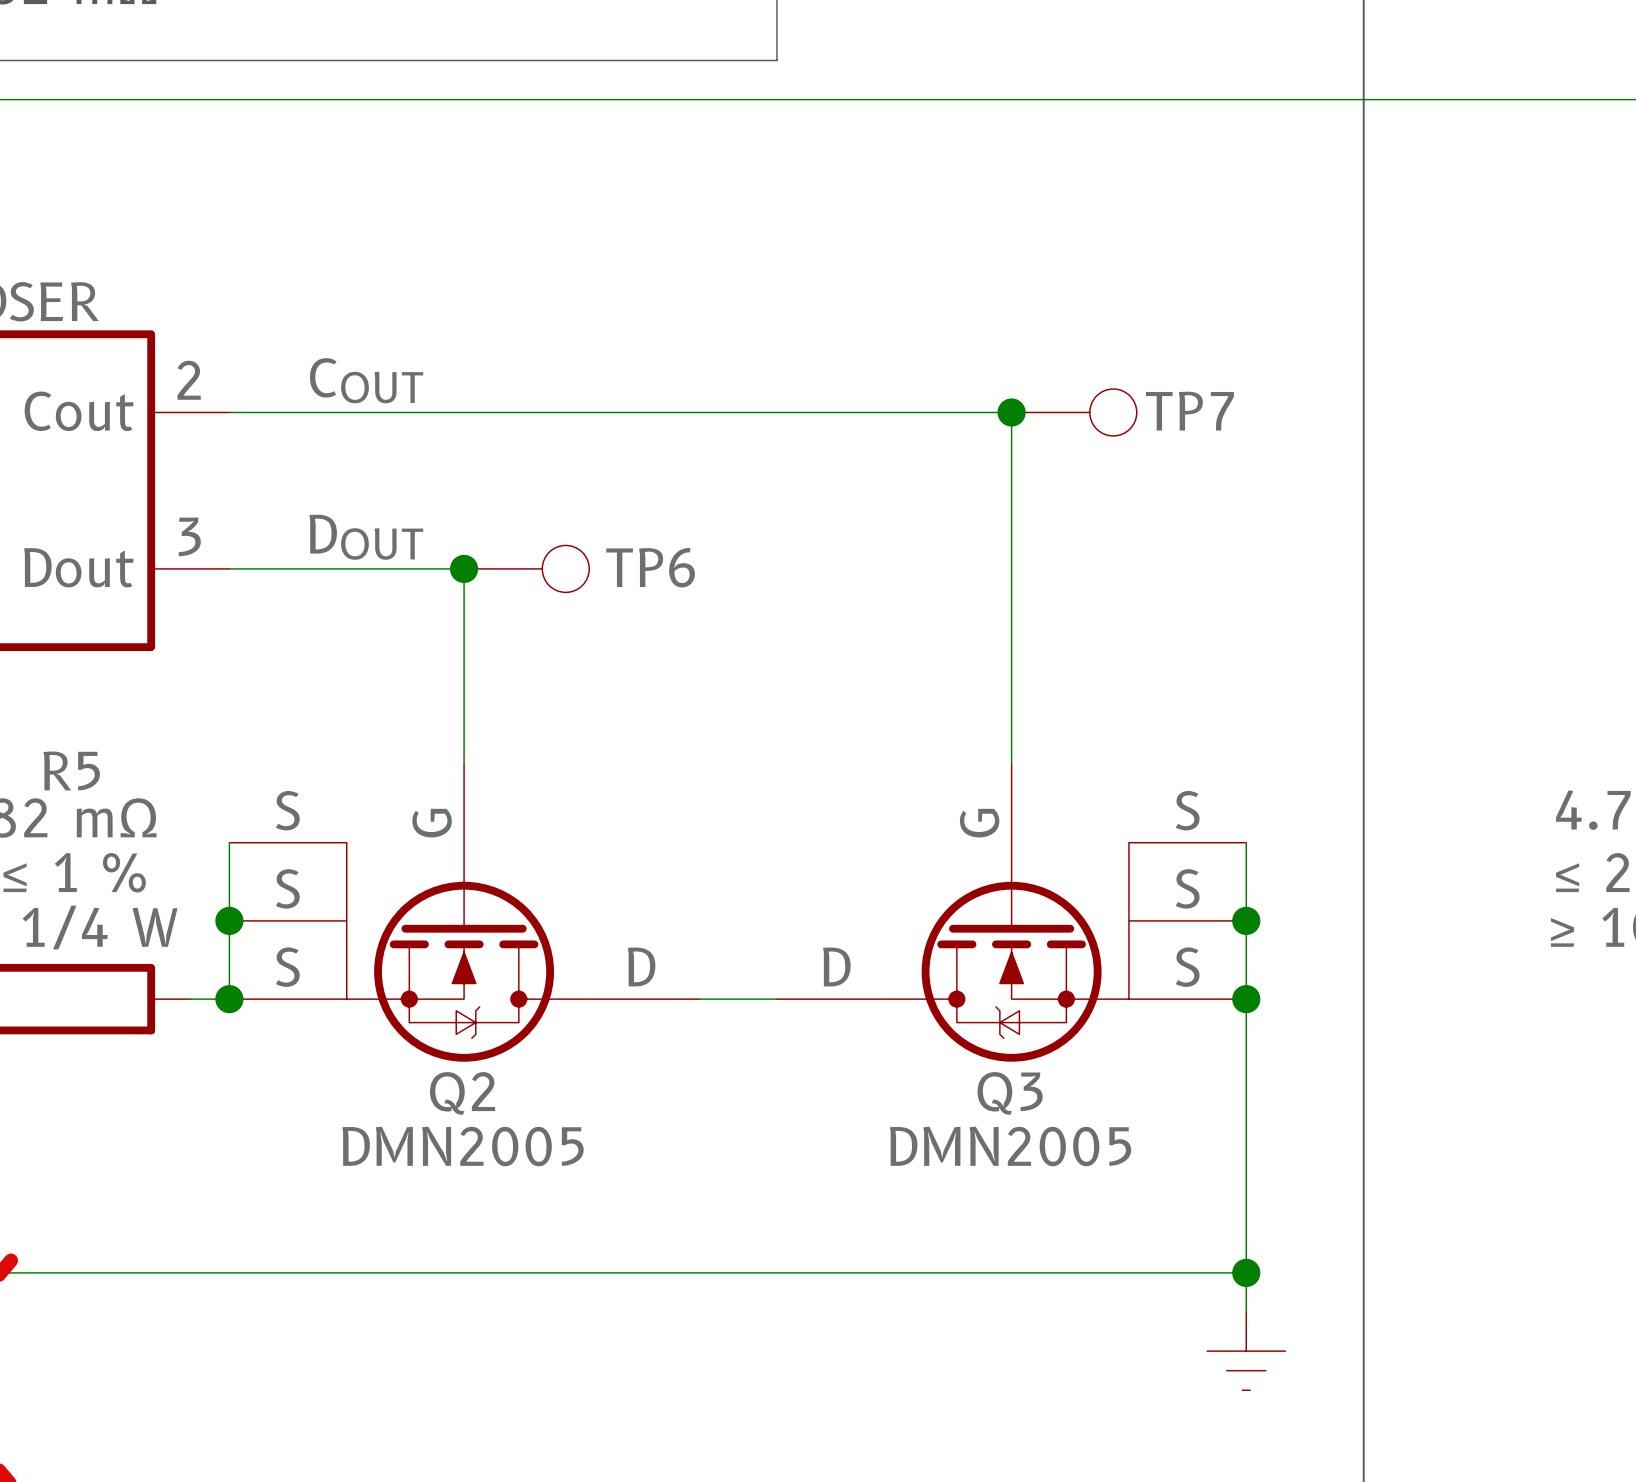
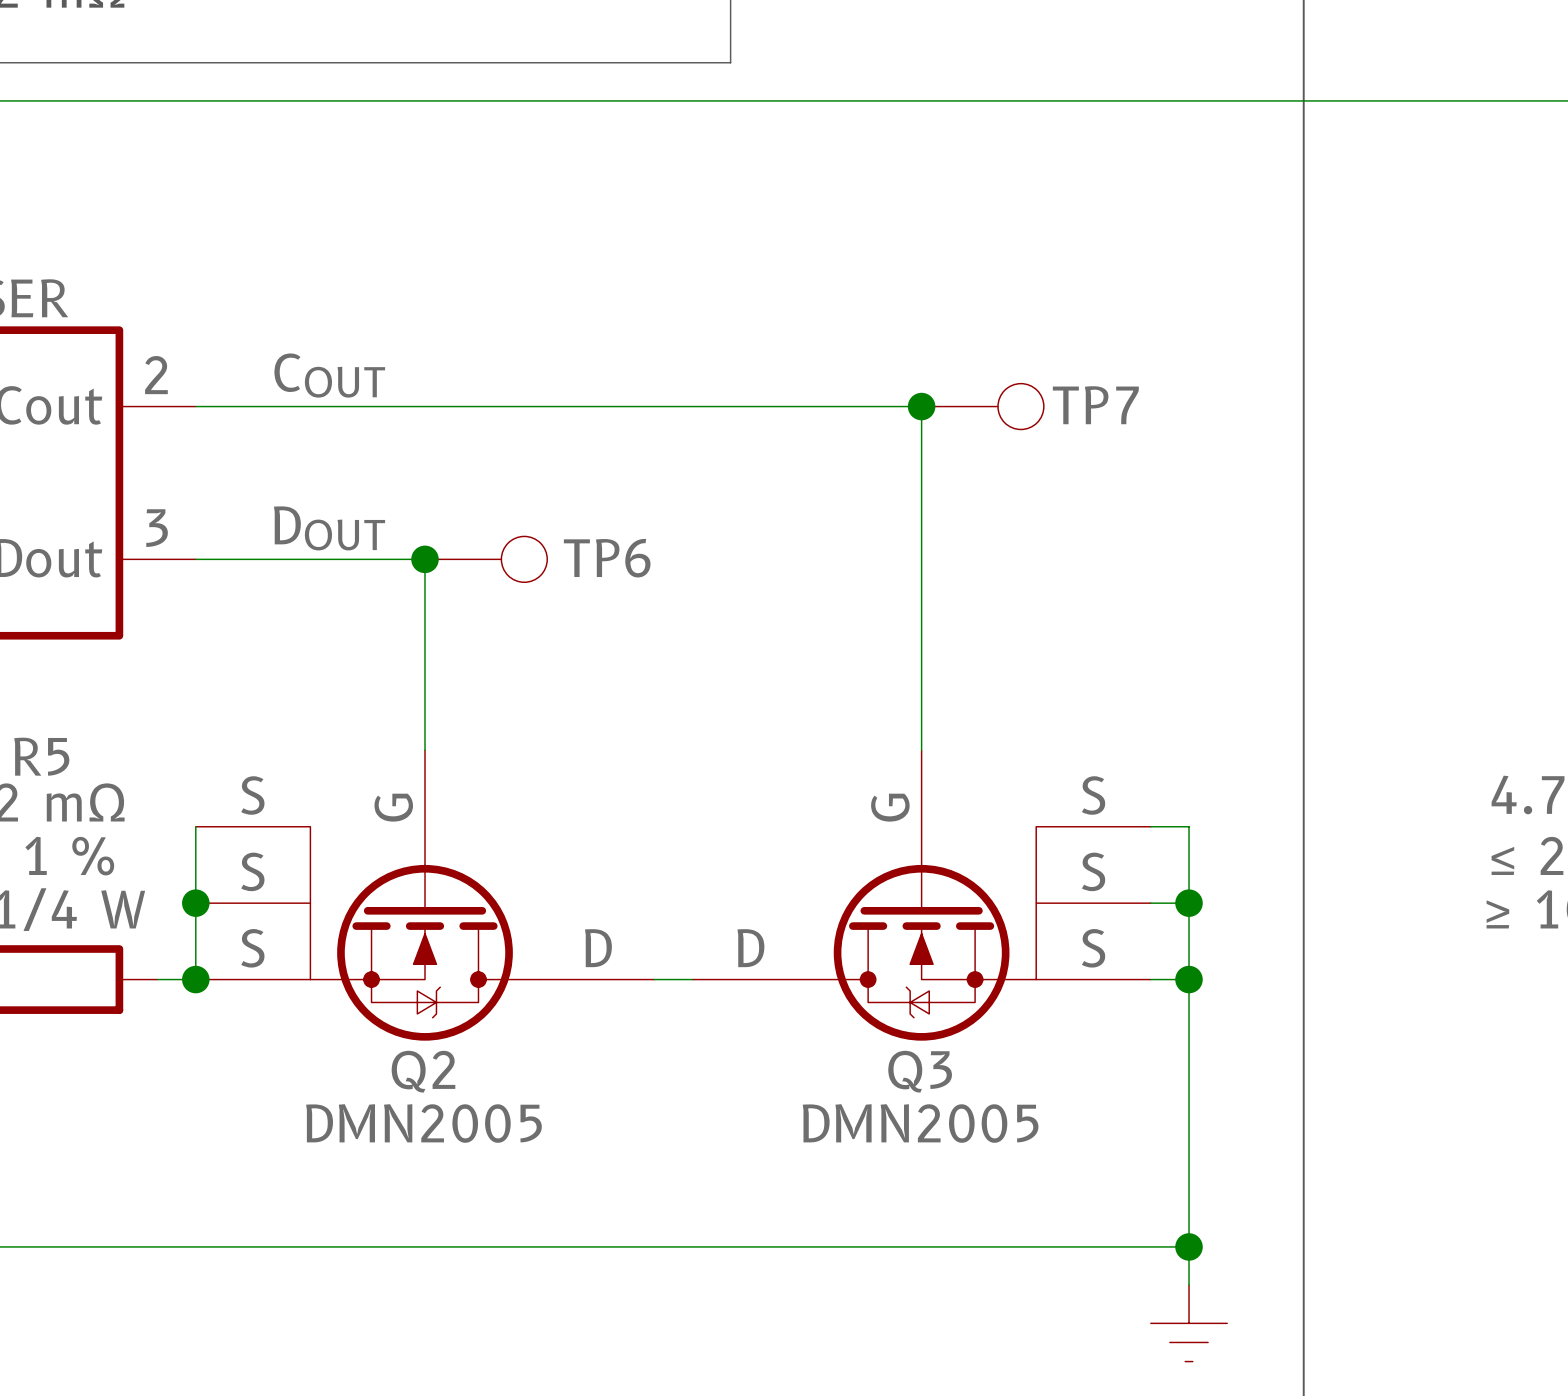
wire: (972, 412) (1011, 412) (1011, 764) -> (921, 406) (921, 750)
junction position: (1011, 412) -> (921, 406)
TP7 position: (1074, 412) -> (982, 406)
Q3 position: (1011, 913) -> (921, 895)

